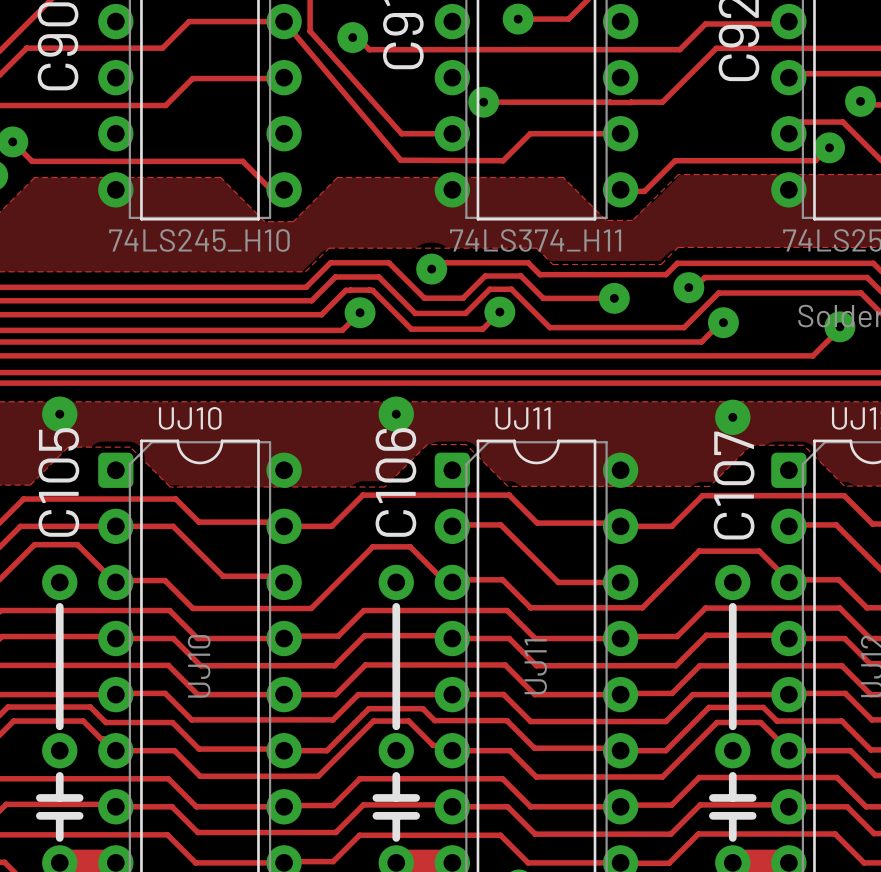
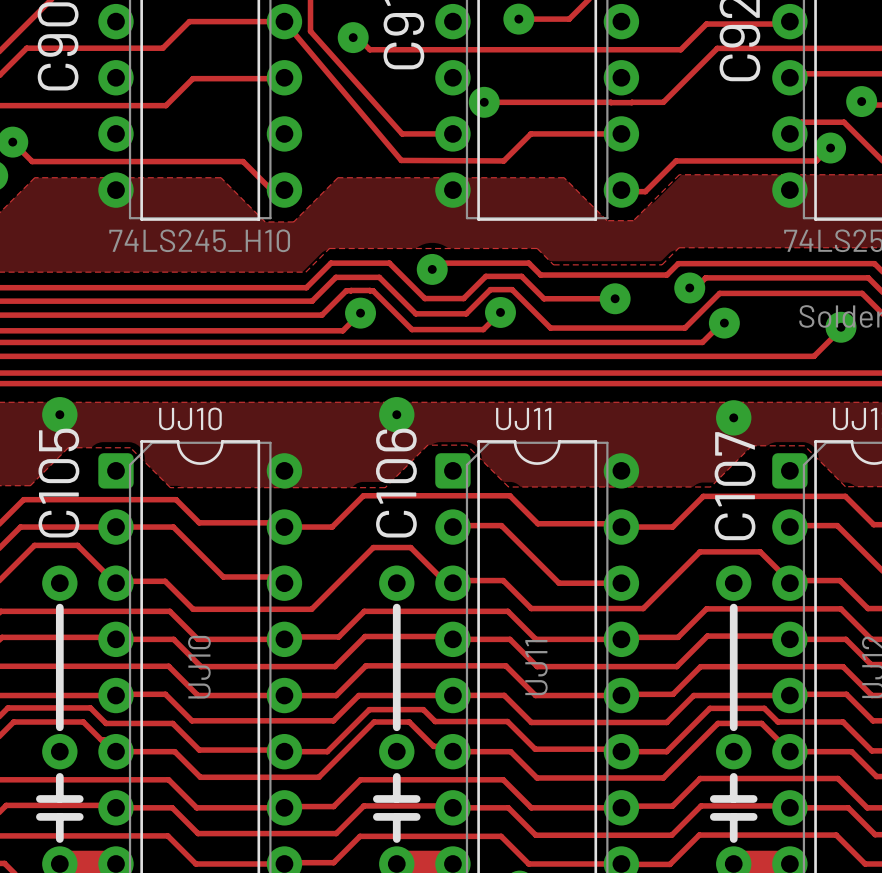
part value: 74LS374_H11 (535, 240) -> none

